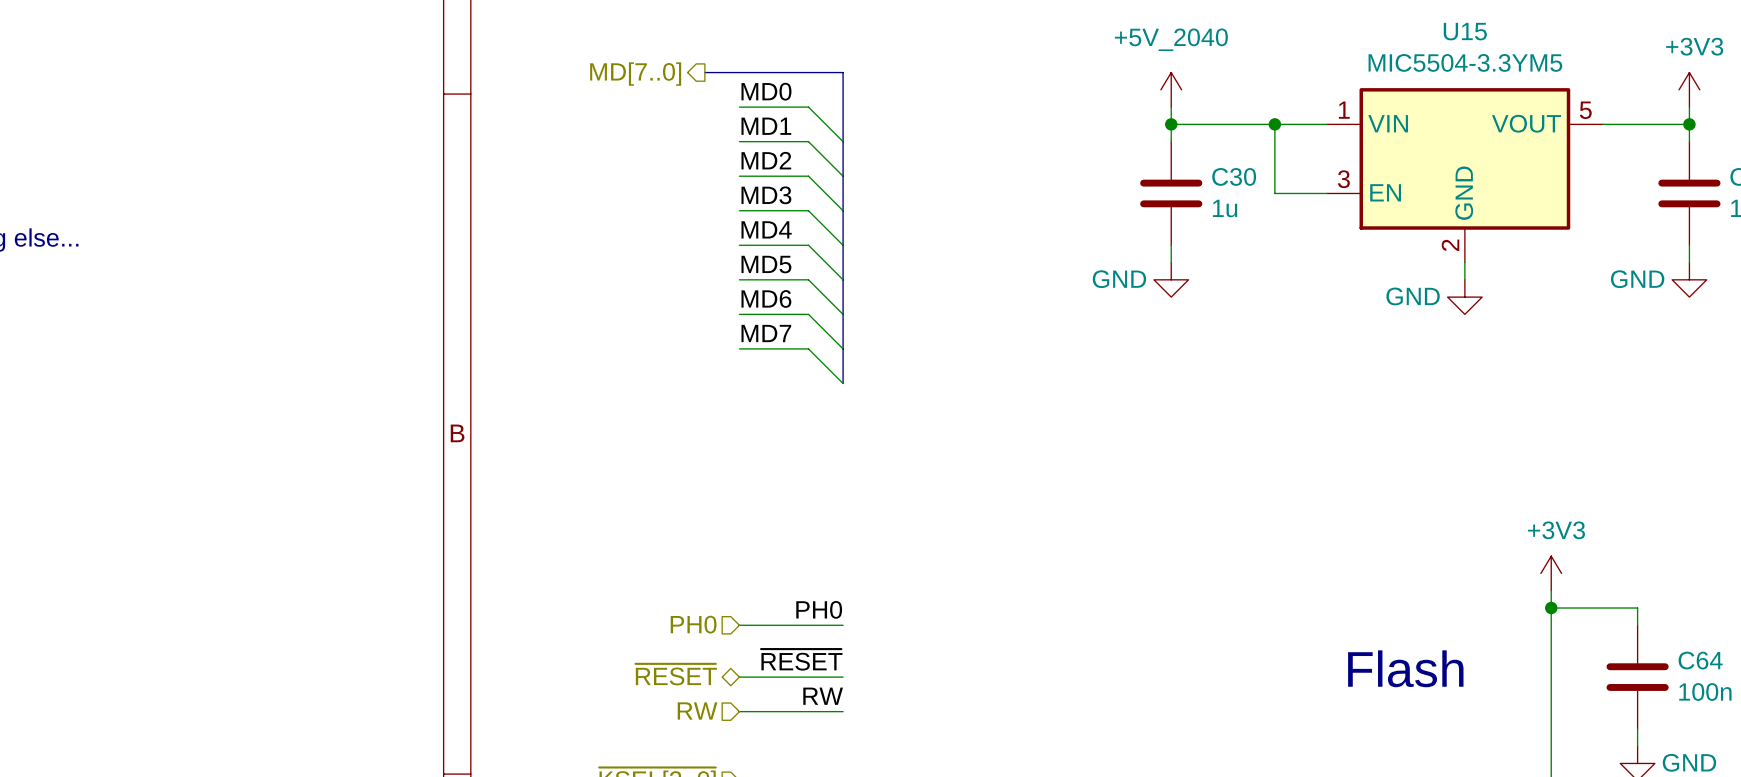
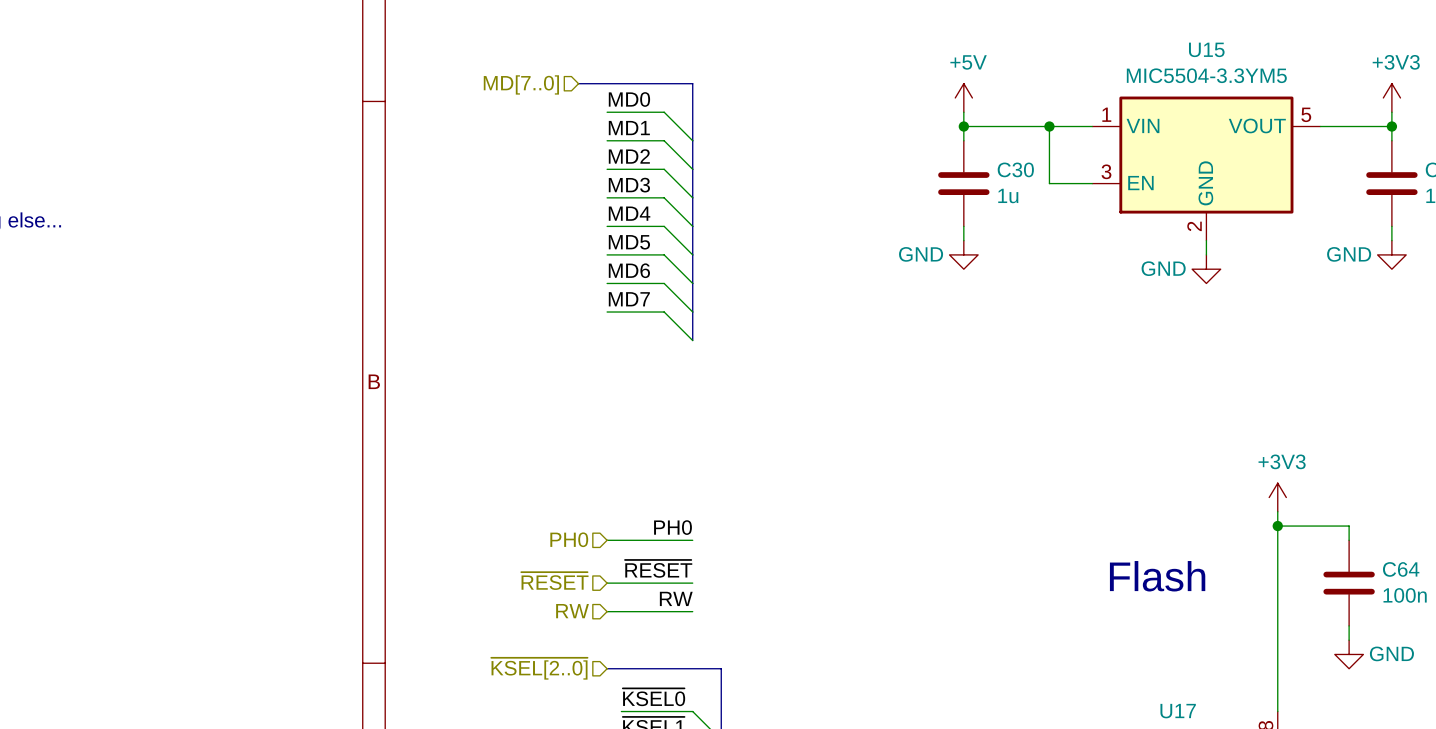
hierarchical label shape: output (635, 74) -> input (521, 84)
power symbol: +5V_2040 (1171, 89) -> +5V (963, 97)
hierarchical label shape: bidirectional (676, 674) -> input (554, 581)

